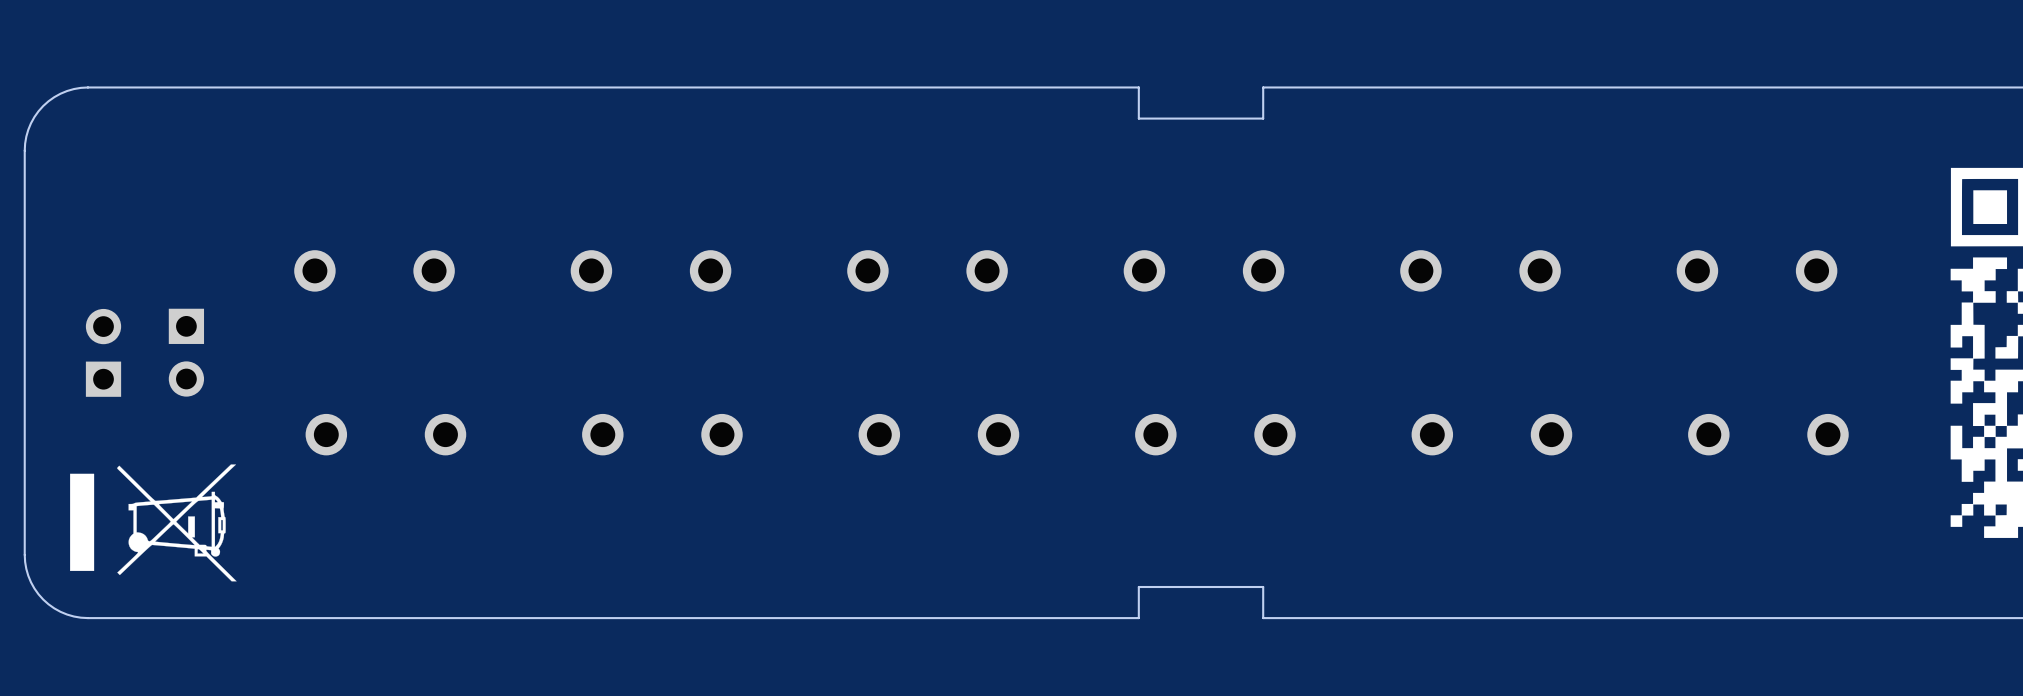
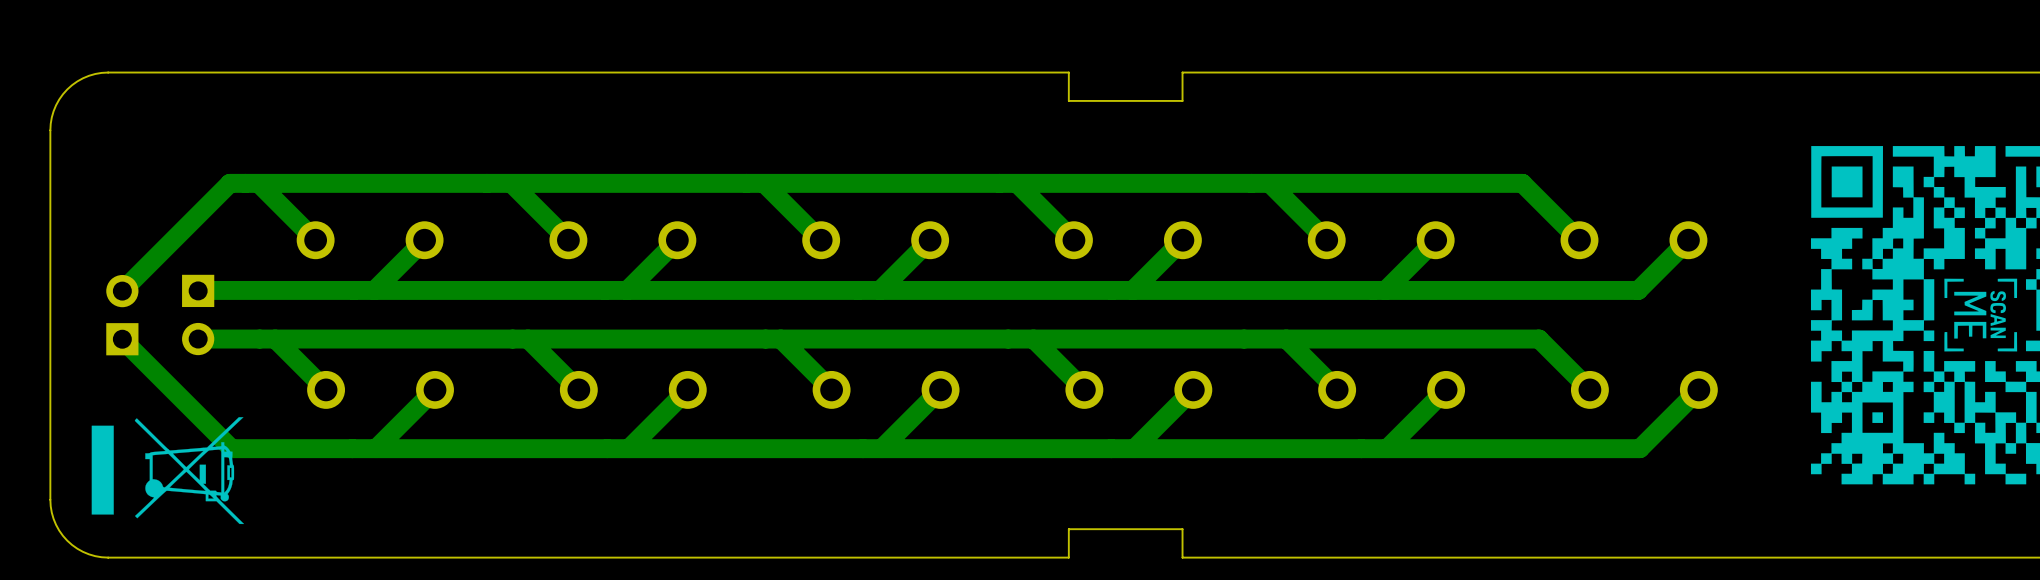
track: none -> (258, 183) (315, 240)
track: none -> (511, 183) (568, 240)
track: none -> (764, 183) (820, 240)
track: none -> (1016, 183) (1073, 240)
track: none -> (1269, 183) (1326, 240)
track: none -> (425, 239) (374, 290)
track: none -> (677, 239) (627, 290)
track: none -> (930, 239) (879, 290)
track: none -> (1183, 239) (1132, 290)
track: none -> (1436, 239) (1385, 290)
track: none -> (1579, 240) (1522, 183) (229, 183) (122, 291)
track: none -> (1688, 239) (1638, 290) (198, 290)
track: none -> (122, 339) (231, 448) (1639, 448) (1698, 389)
track: none -> (198, 339) (1539, 339) (1589, 389)
track: none -> (275, 339) (326, 389)
track: none -> (527, 339) (578, 389)
track: none -> (780, 339) (831, 389)
track: none -> (1033, 339) (1084, 389)
track: none -> (1286, 339) (1337, 389)
track: none -> (434, 389) (376, 448)
track: none -> (687, 389) (628, 448)
track: none -> (940, 389) (881, 448)
track: none -> (1193, 389) (1134, 448)
track: none -> (1445, 389) (1387, 448)

